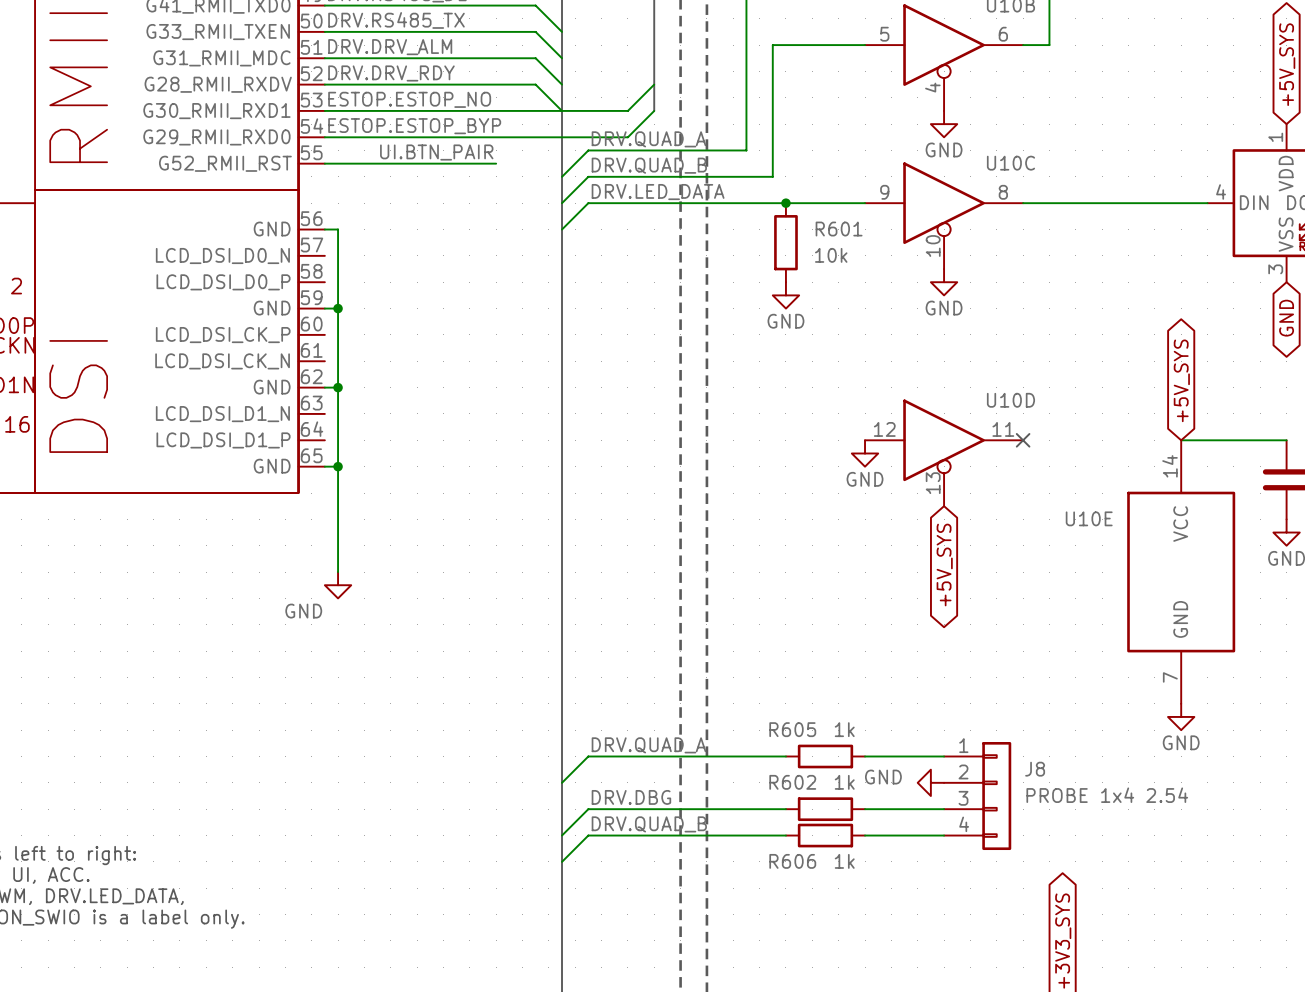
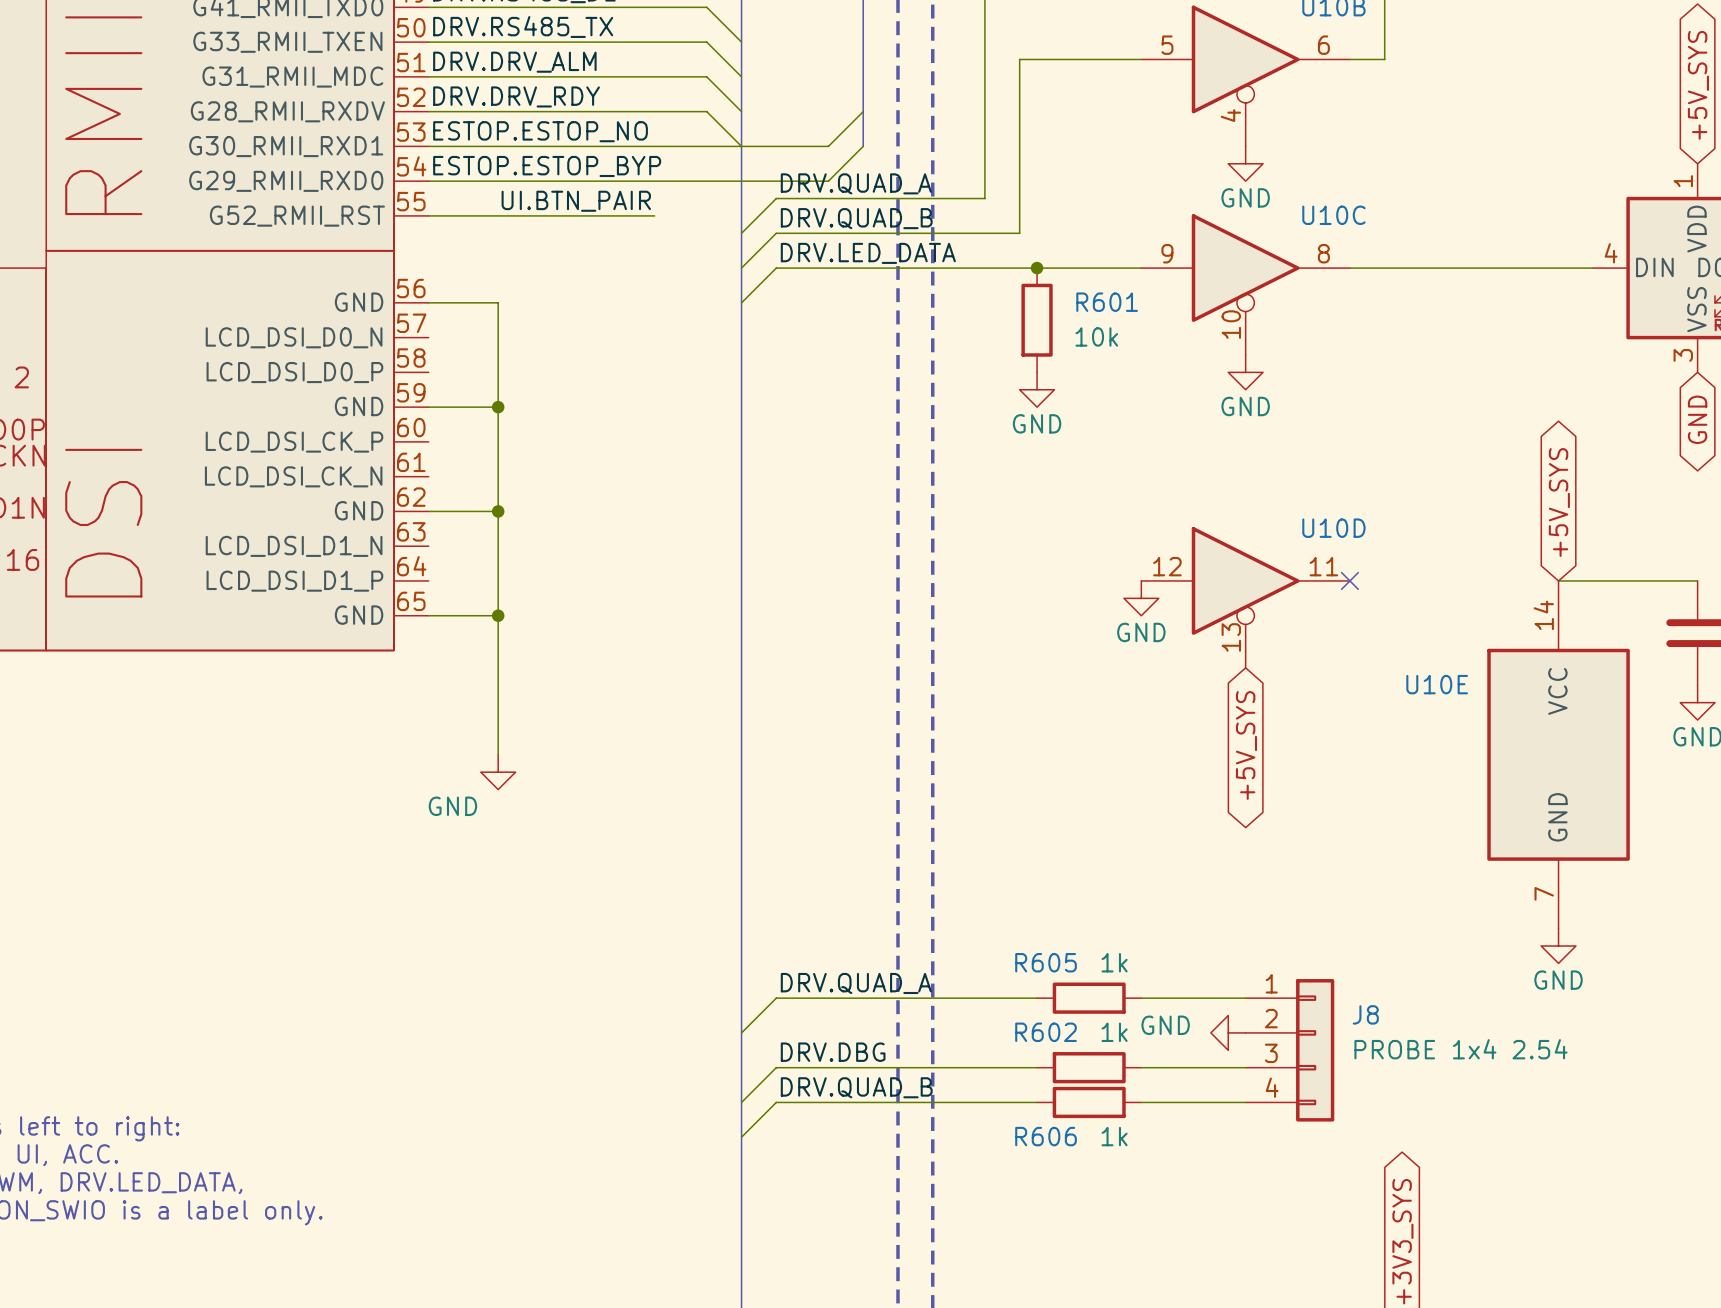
wire: (338, 229) (338, 572) -> (446, 302) (498, 302) (498, 754)
wire: none -> (446, 407) (498, 407)
junction position: (338, 308) -> (498, 407)
wire: none -> (446, 511) (498, 511)
junction position: (338, 387) -> (498, 511)
wire: none -> (446, 615) (498, 615)
junction position: (338, 466) -> (498, 615)
power symbol position: GND (338, 585) -> GND (498, 772)

